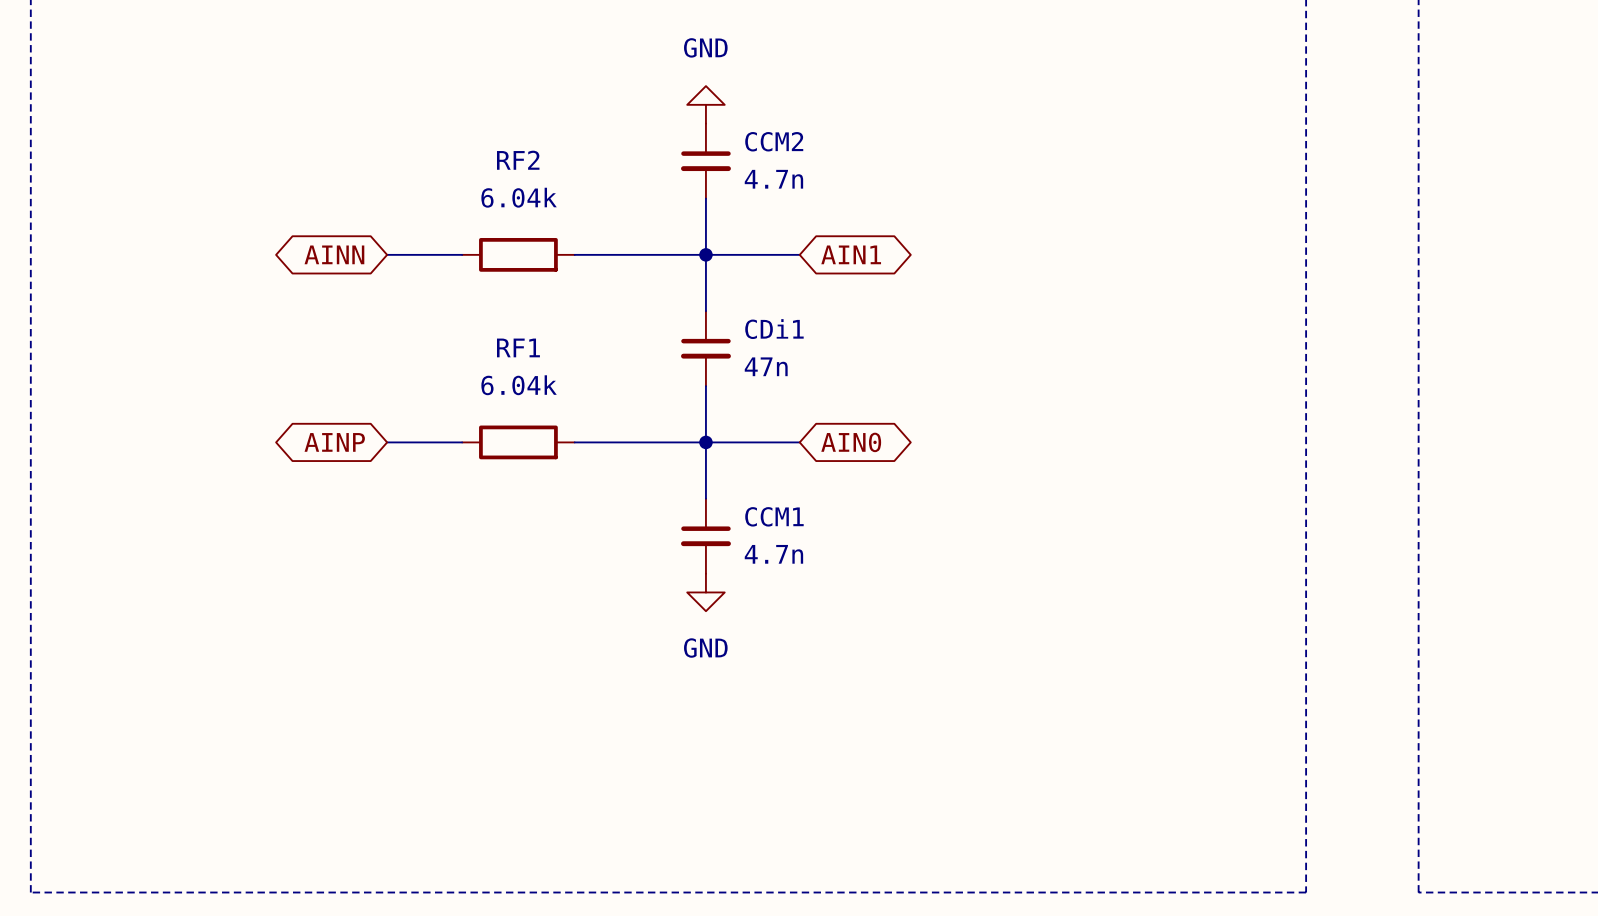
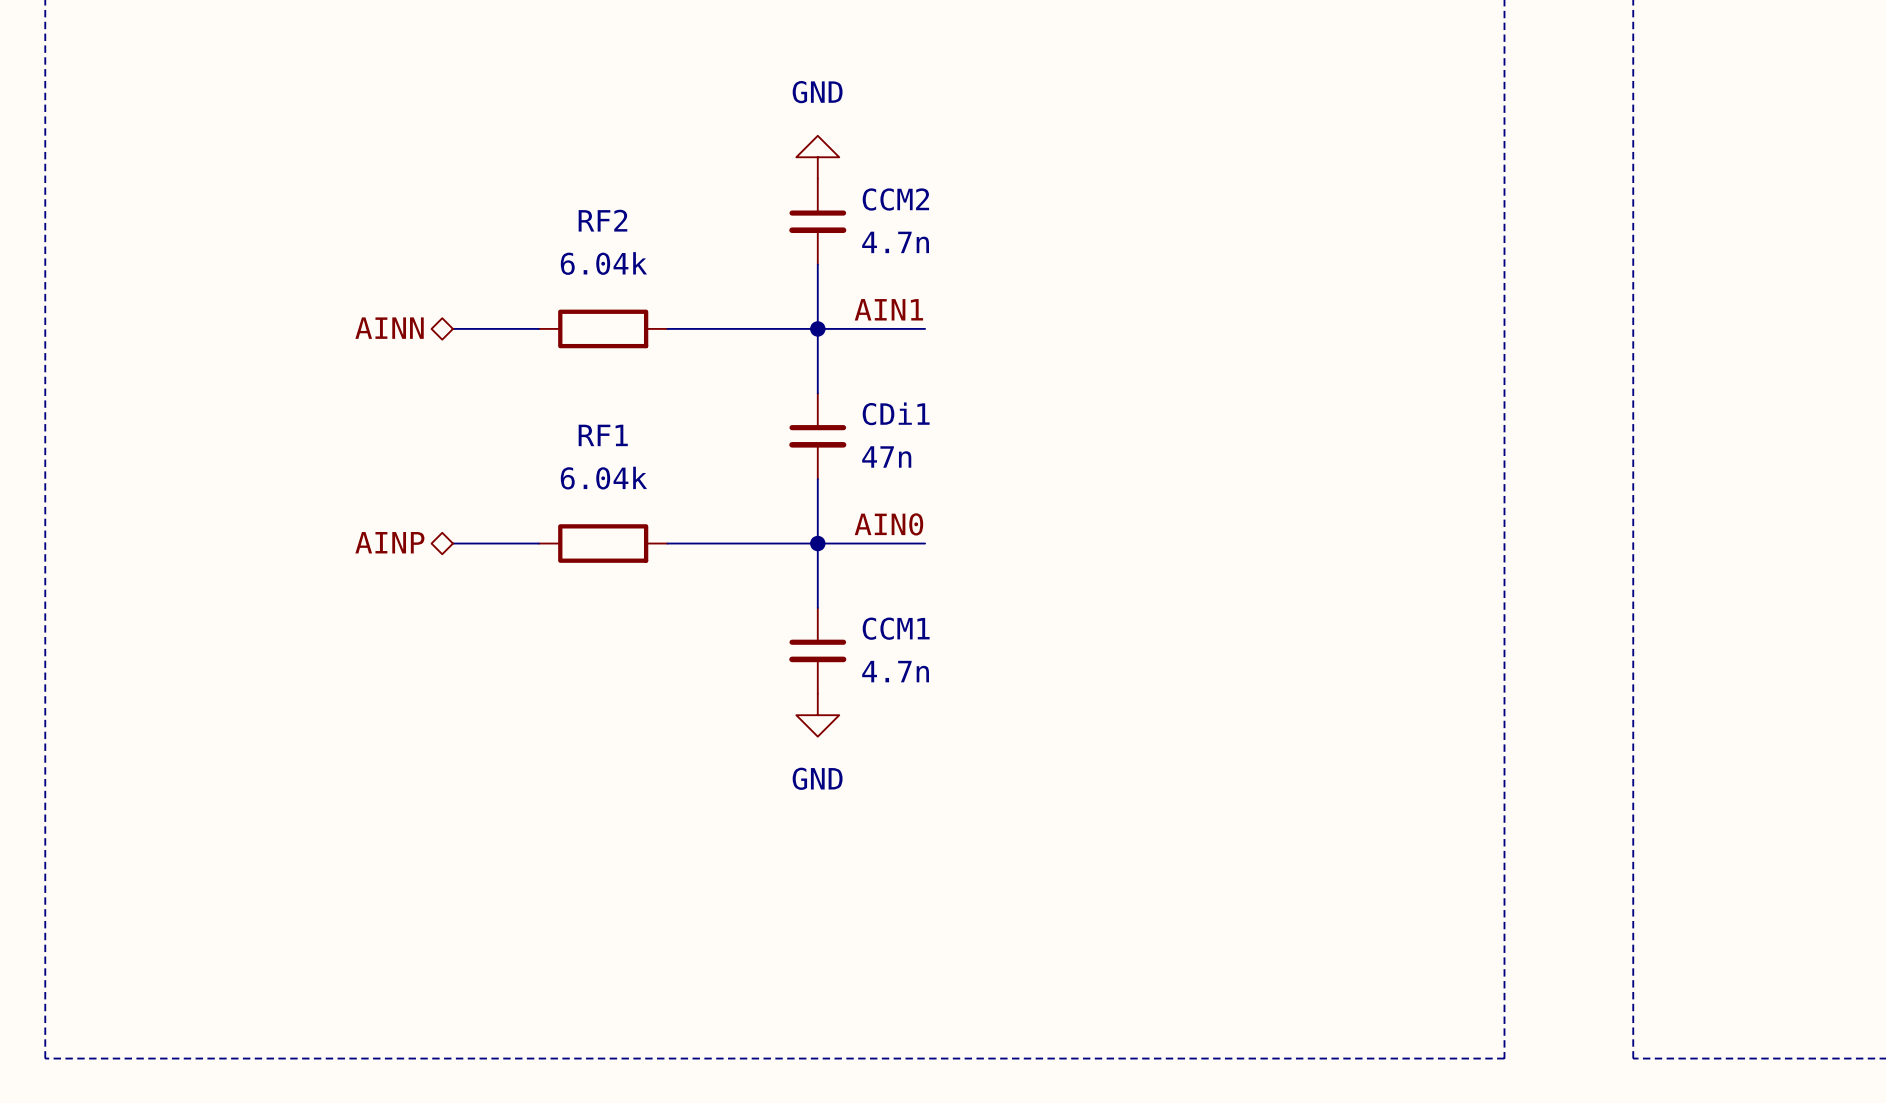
label: none -> AIN1 (888, 309)
hierarchical label: none -> AINN (389, 328)
global label: AINN (334, 254) -> none
global label: AIN1 (851, 254) -> none
label: none -> AIN0 (888, 524)
hierarchical label: none -> AINP (389, 542)
global label: AINP (334, 442) -> none
global label: AIN0 (851, 442) -> none

